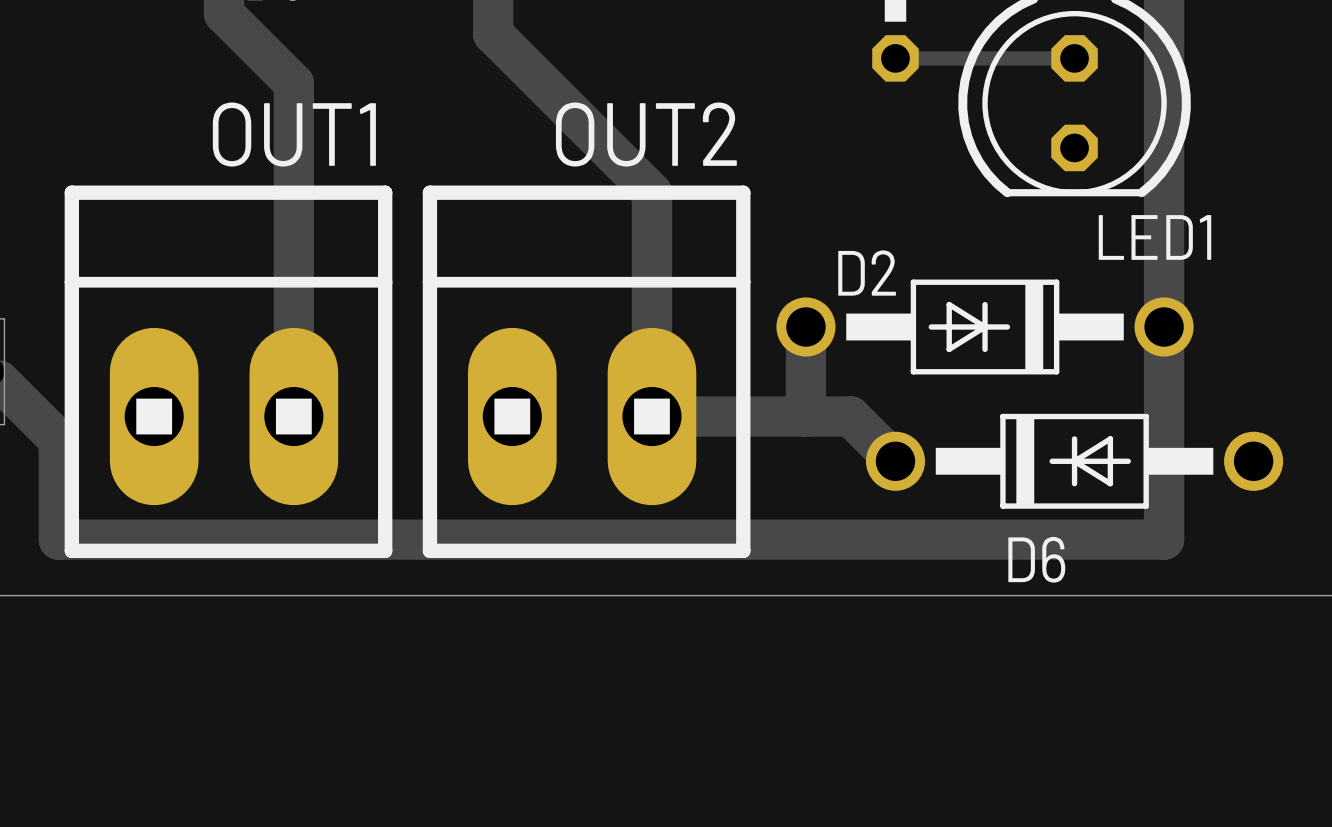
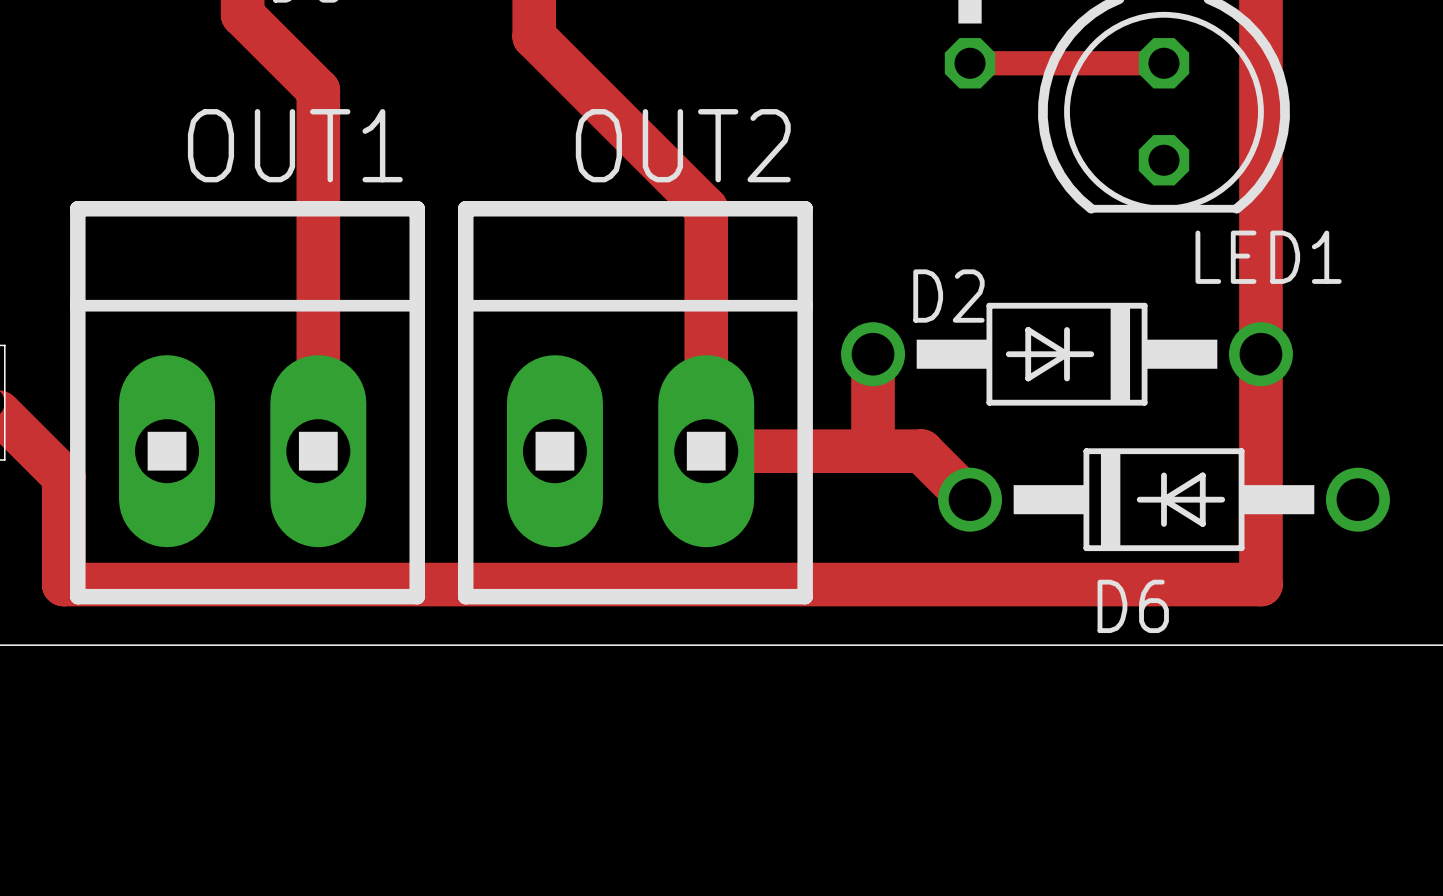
track width: thin (895, 58) (1074, 58) -> thick (970, 63) (1163, 63)

